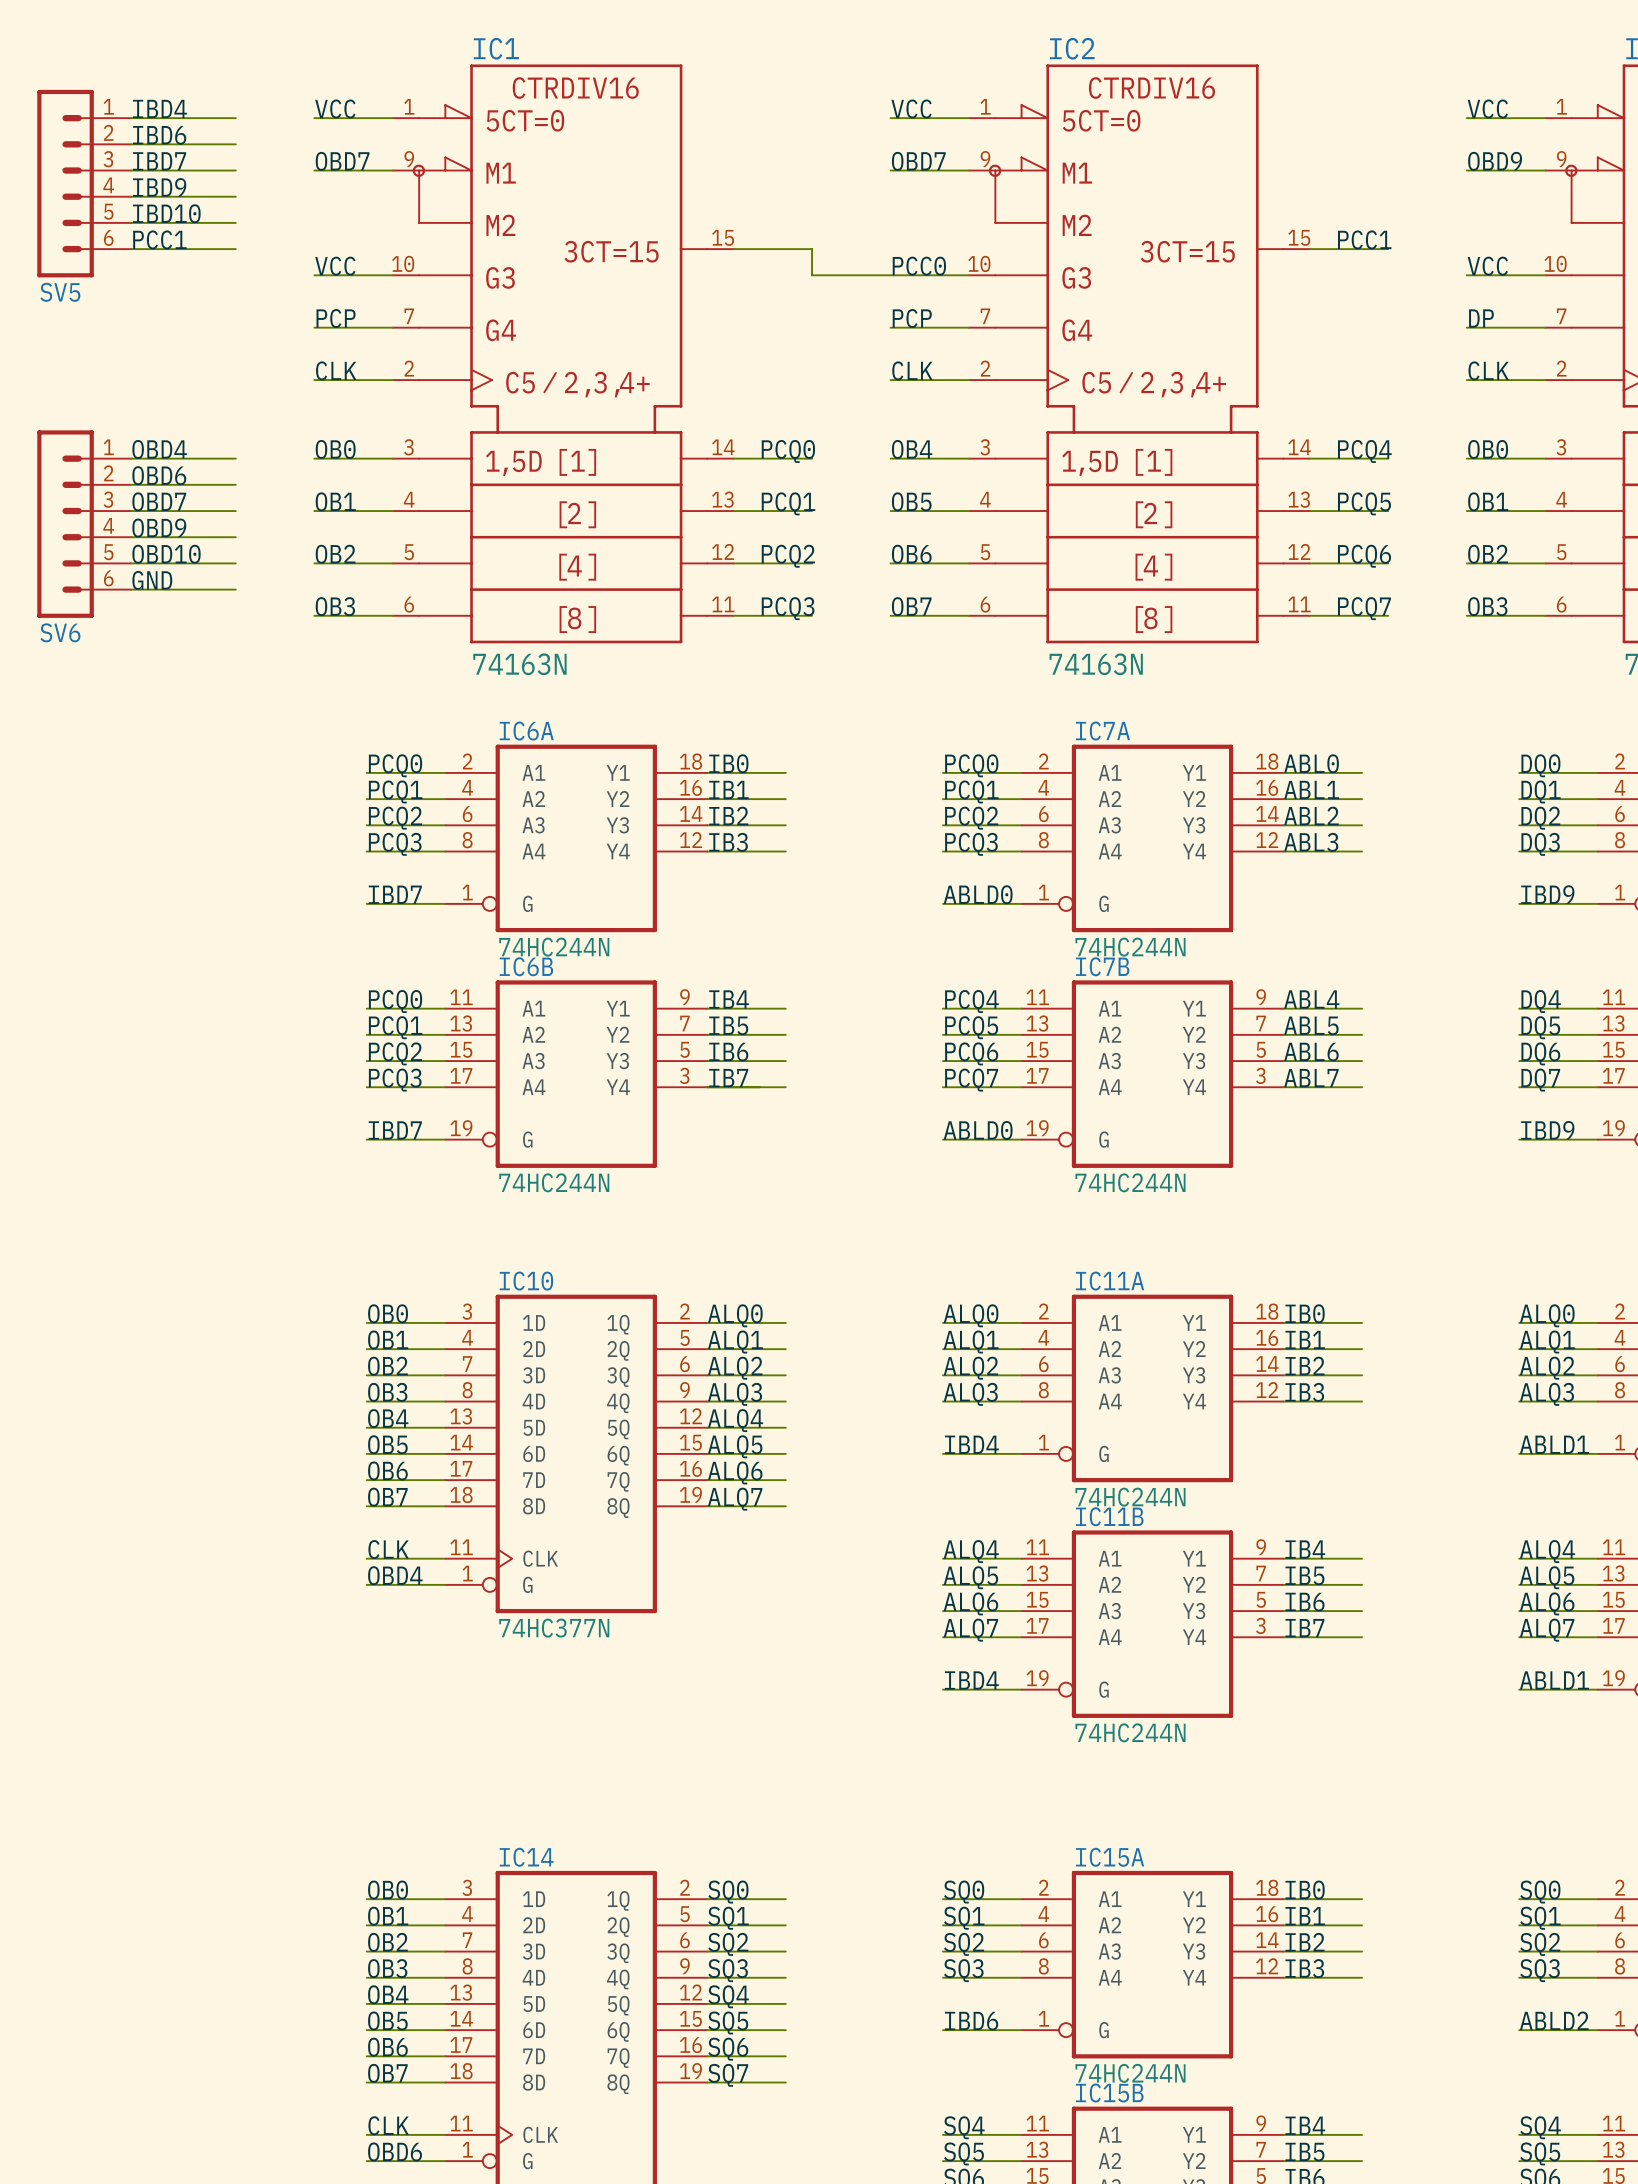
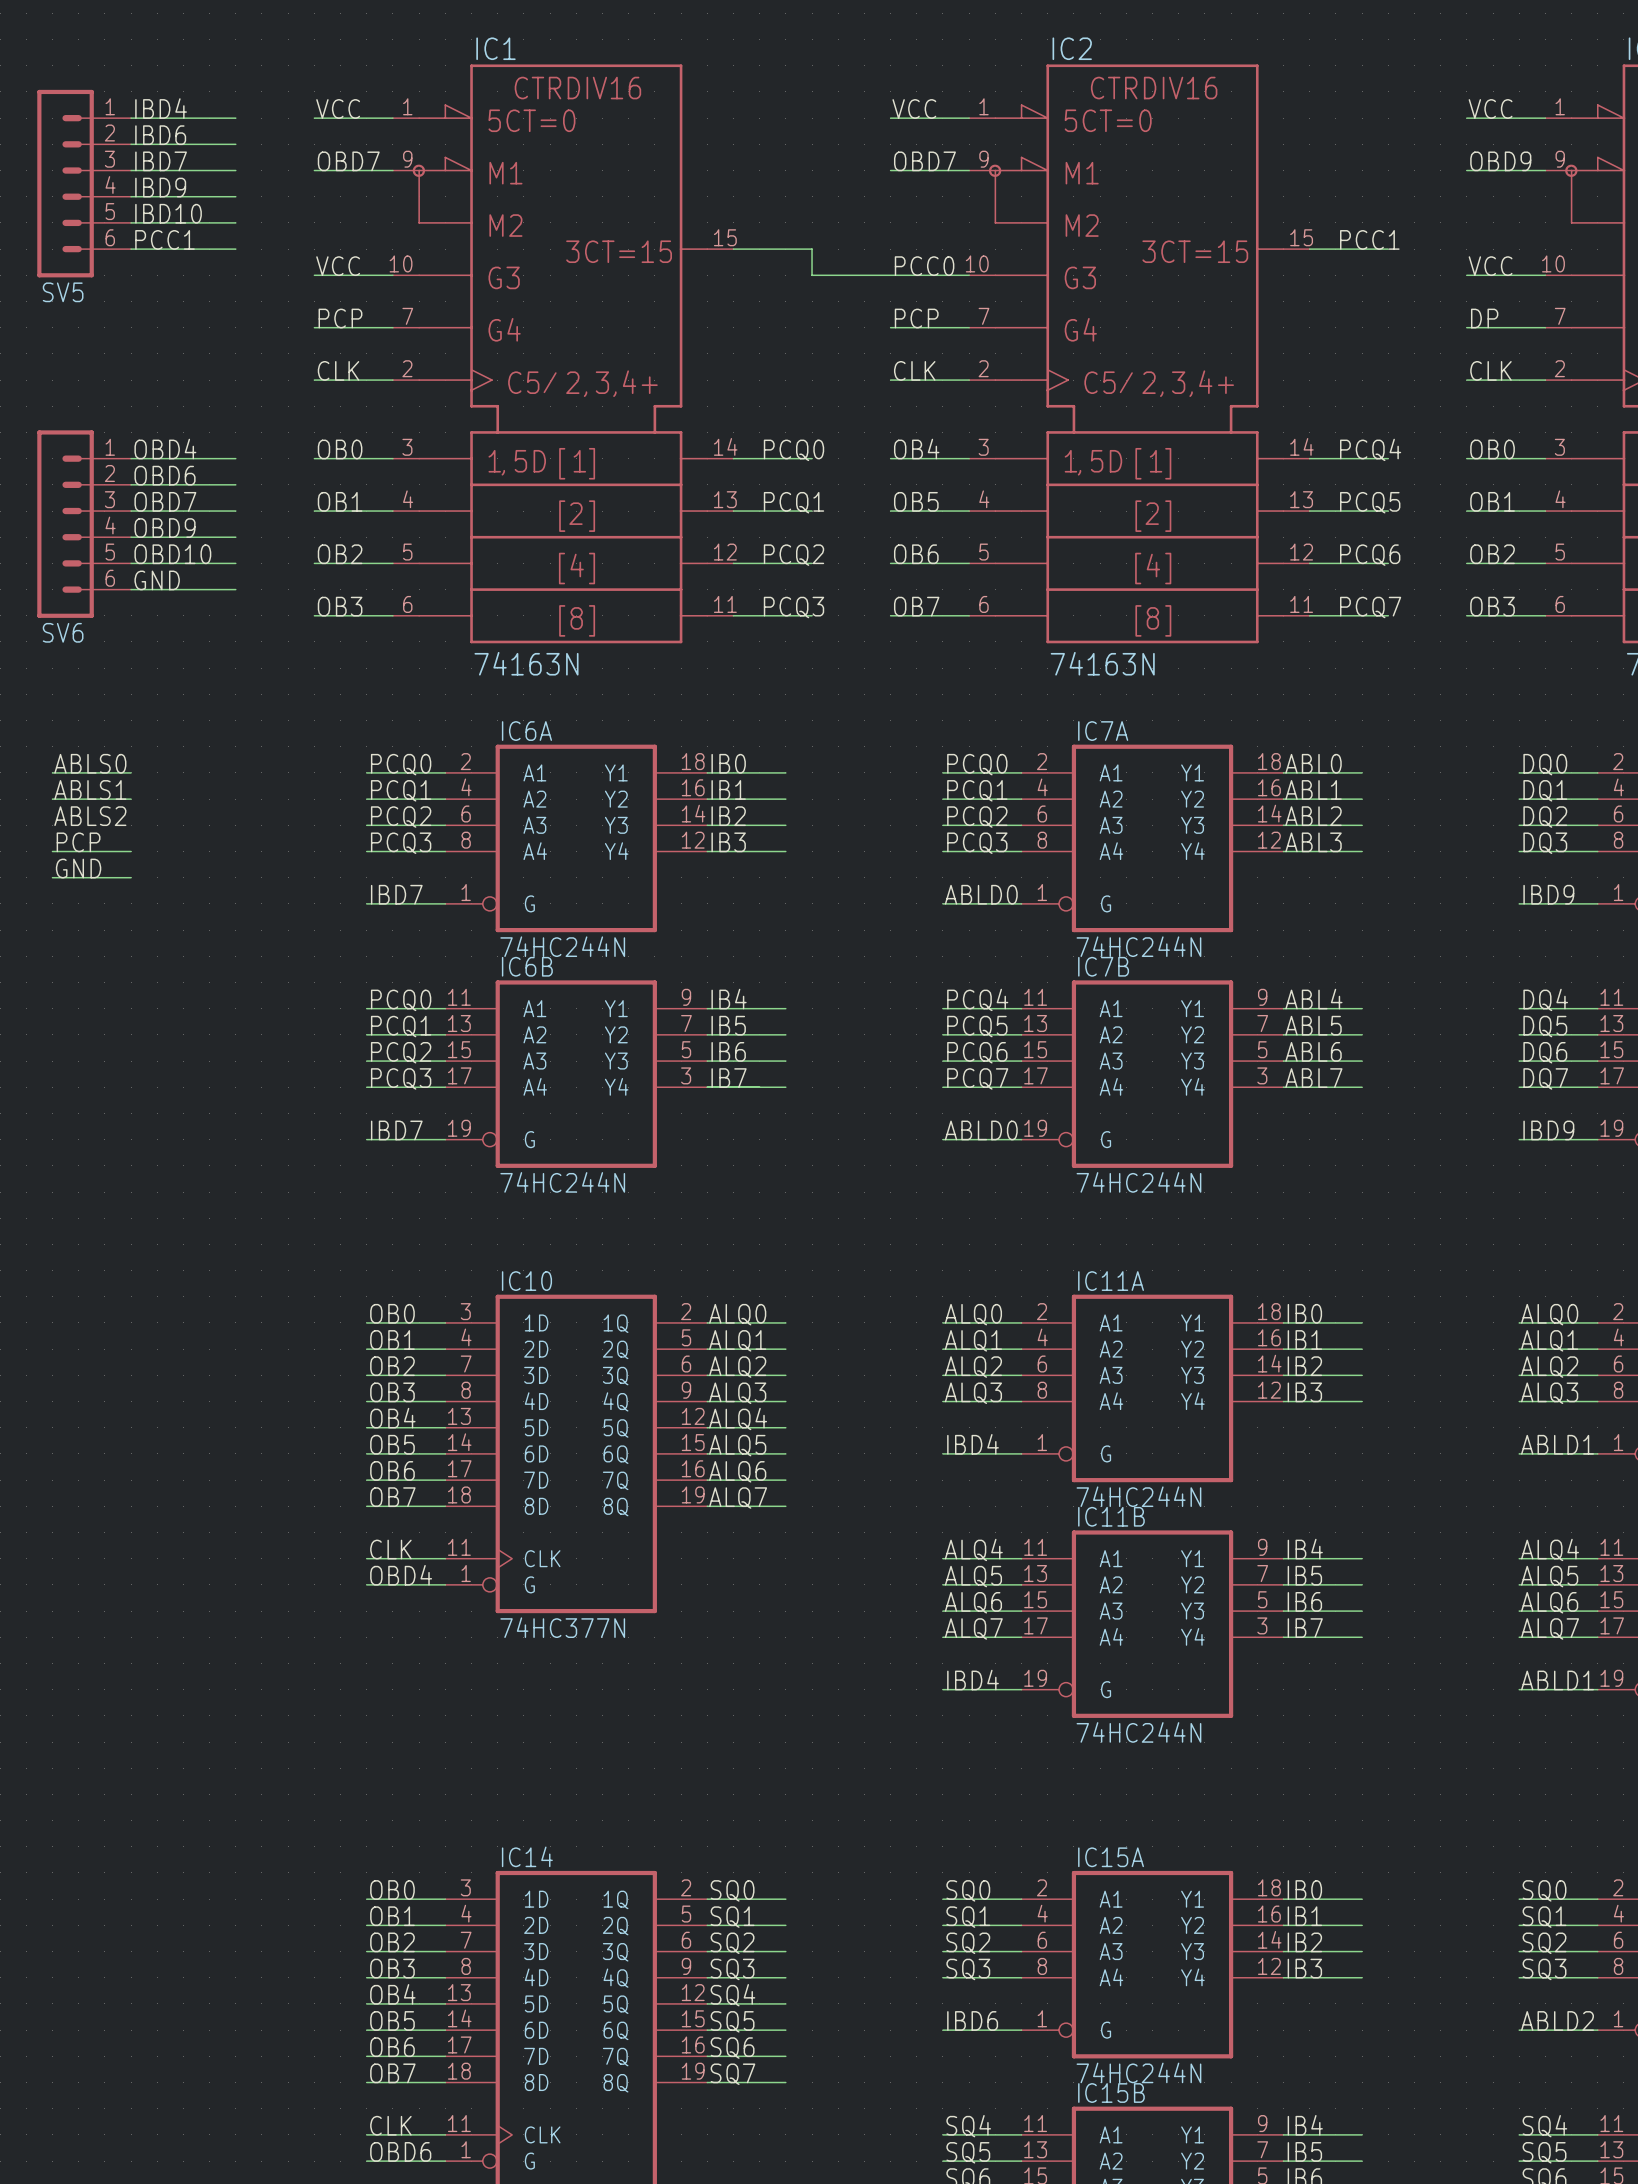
label: none -> ABLS0 (90, 763)
wire: none -> (52, 772) (131, 772)
label: none -> ABLS1 (90, 789)
wire: none -> (52, 799) (131, 799)
label: none -> ABLS2 (90, 816)
label: none -> PCP (78, 842)
wire: none -> (52, 851) (131, 851)
label: none -> GND (78, 868)
wire: none -> (52, 877) (131, 877)

